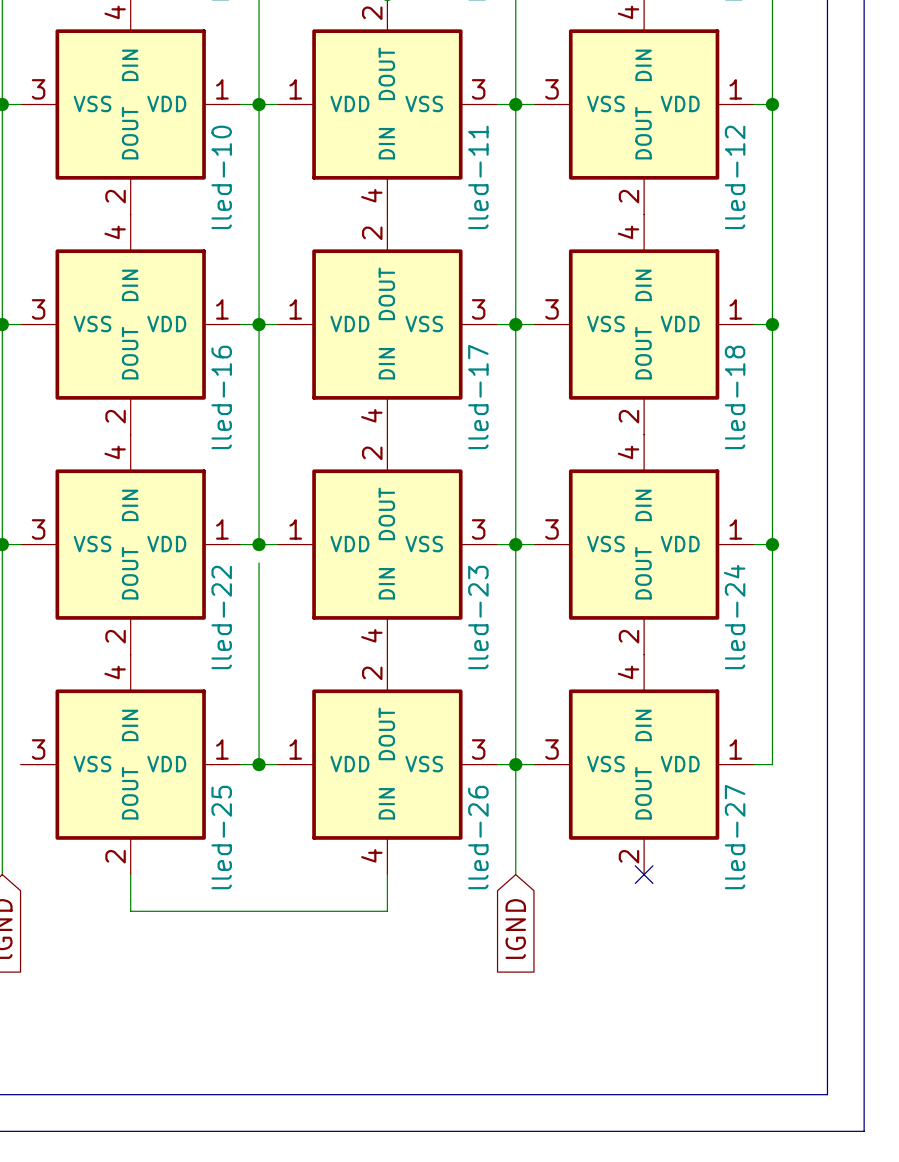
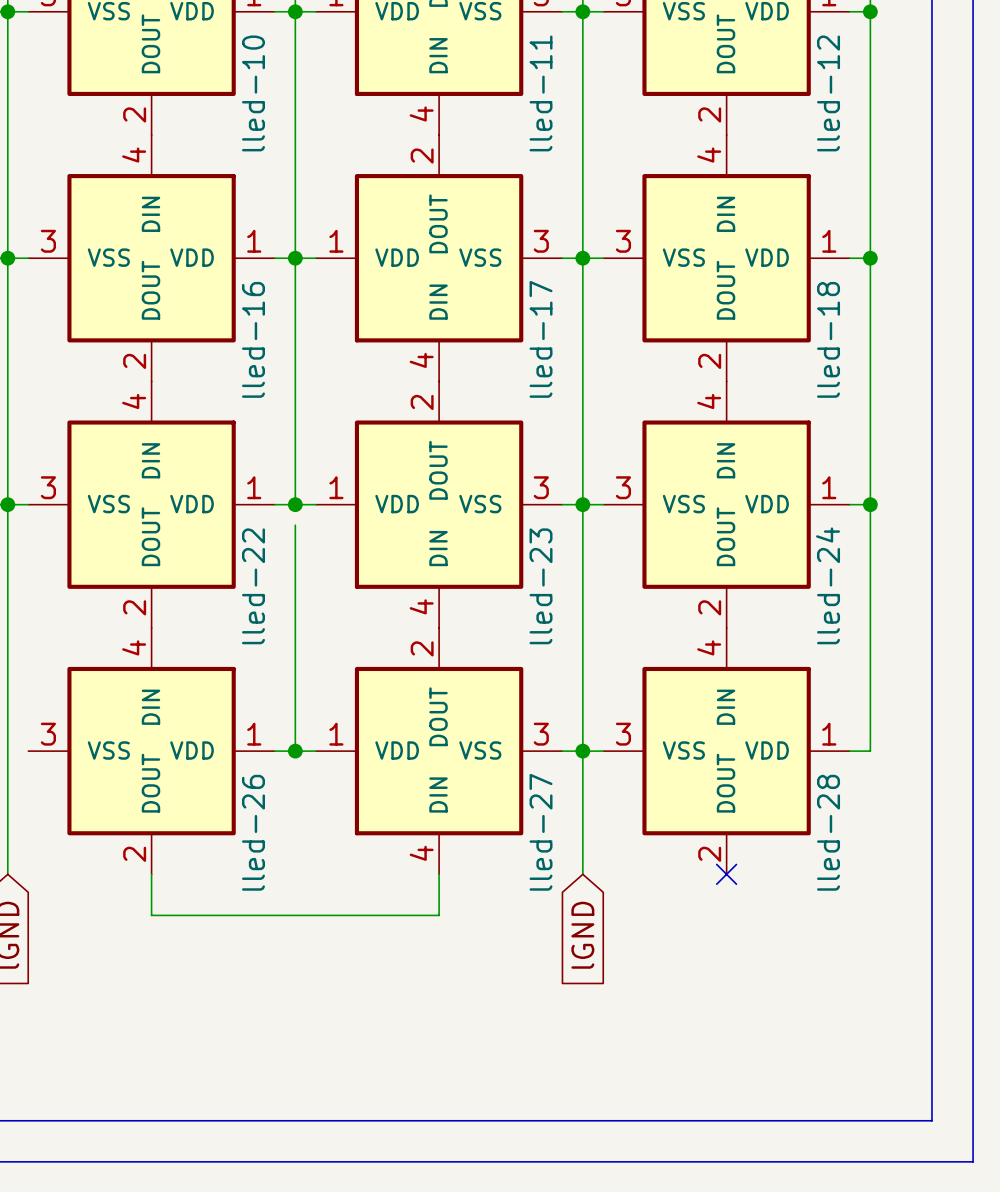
lled-25 name: lled-25 (221, 837) -> lled-26 (253, 832)
lled-26 name: lled-26 (478, 837) -> lled-27 (541, 832)
lled-27 name: lled-27 (735, 837) -> lled-28 (828, 832)

